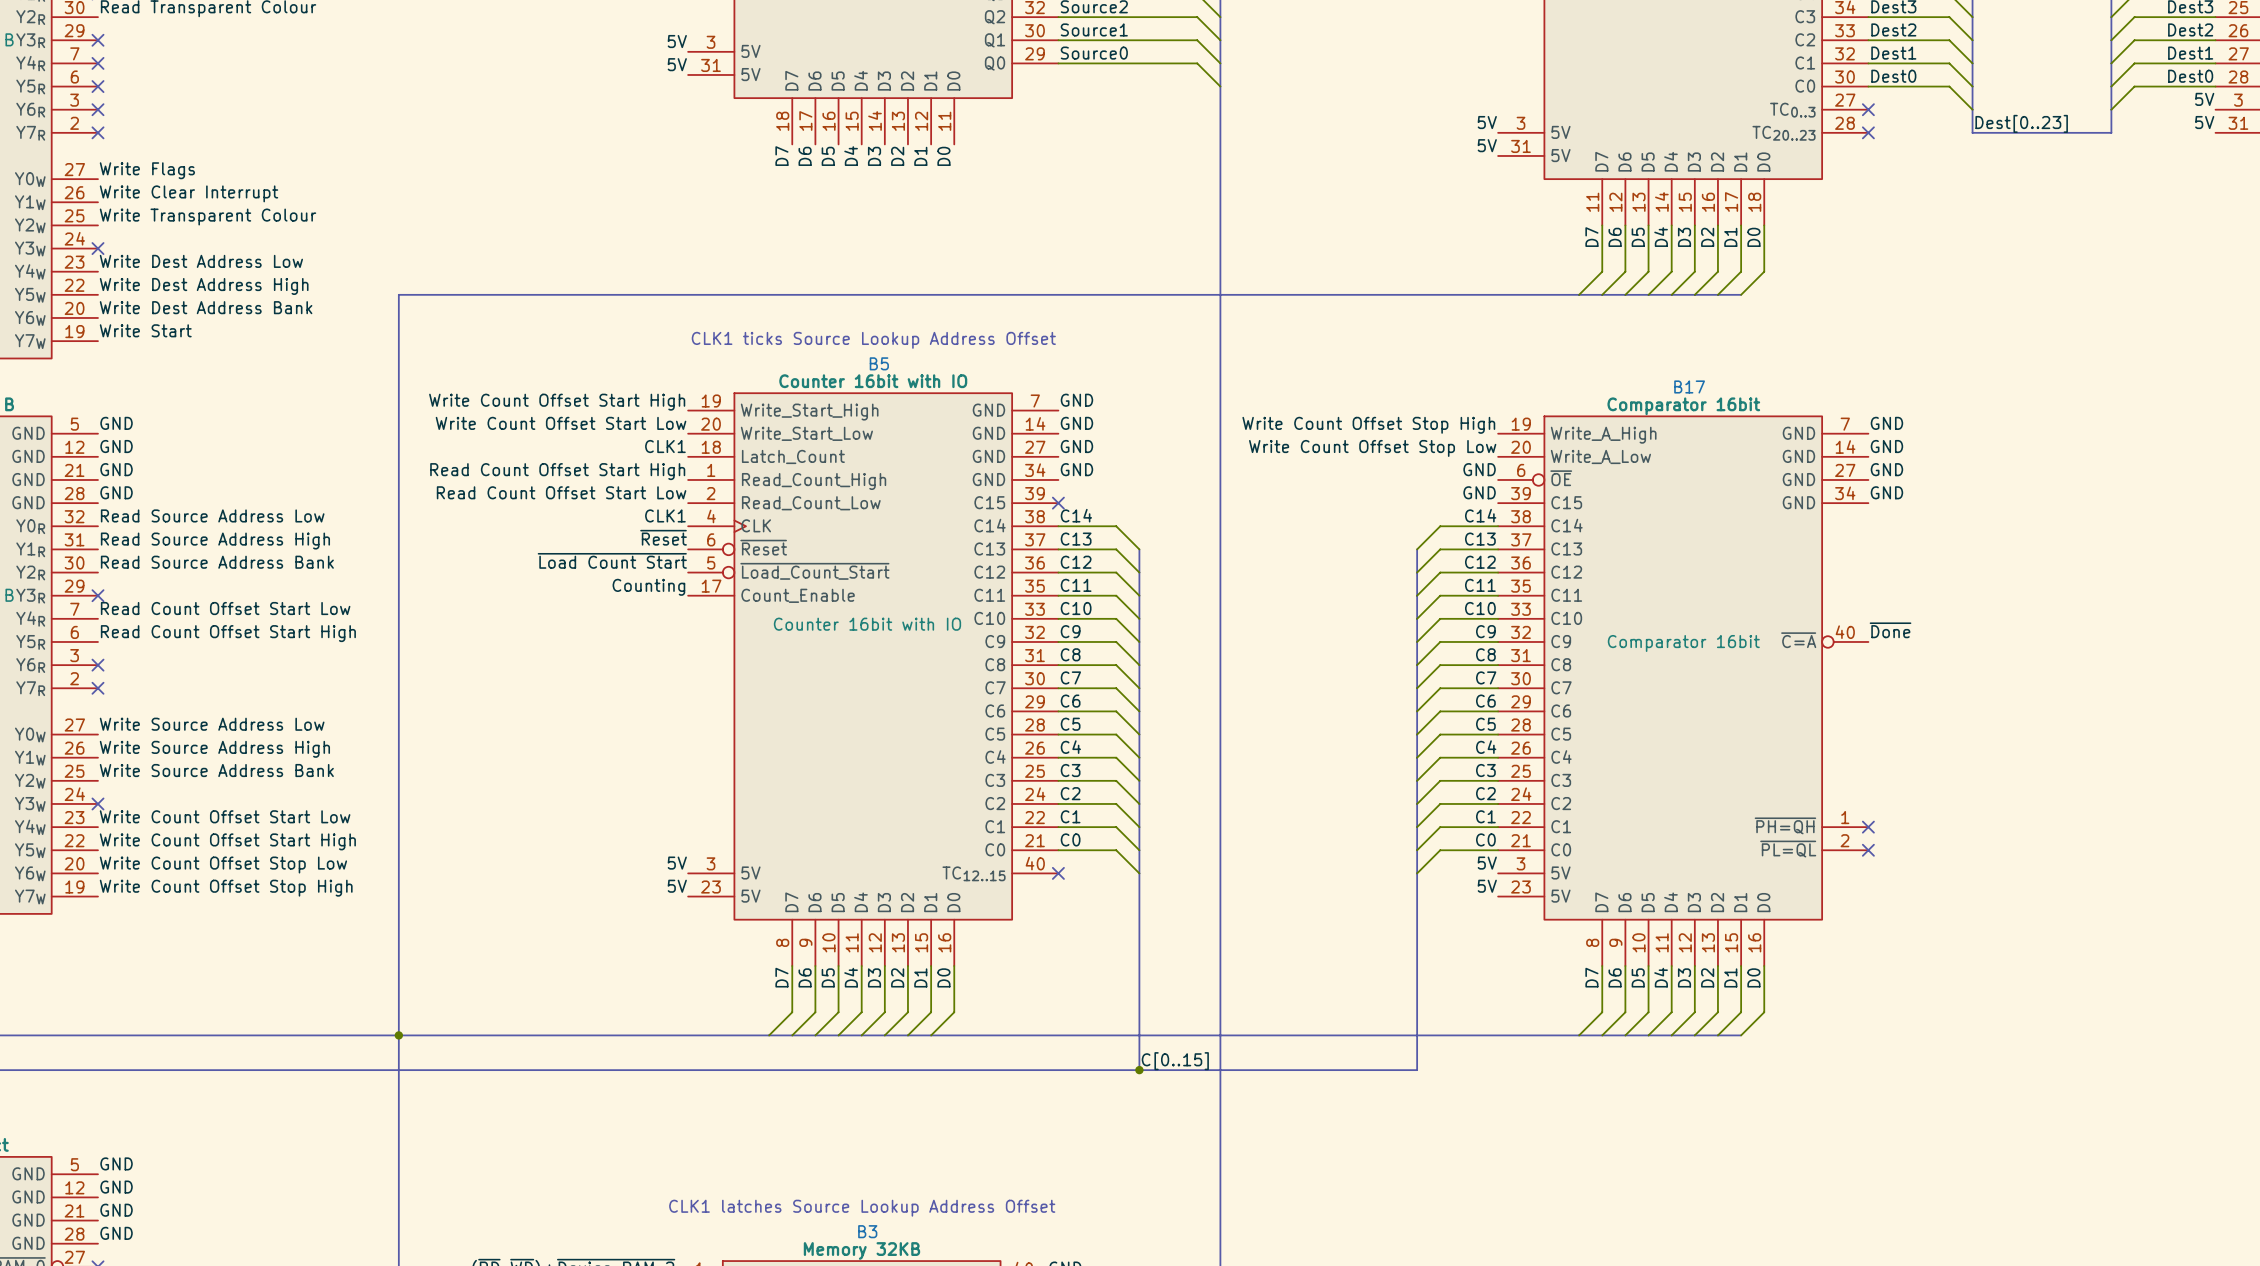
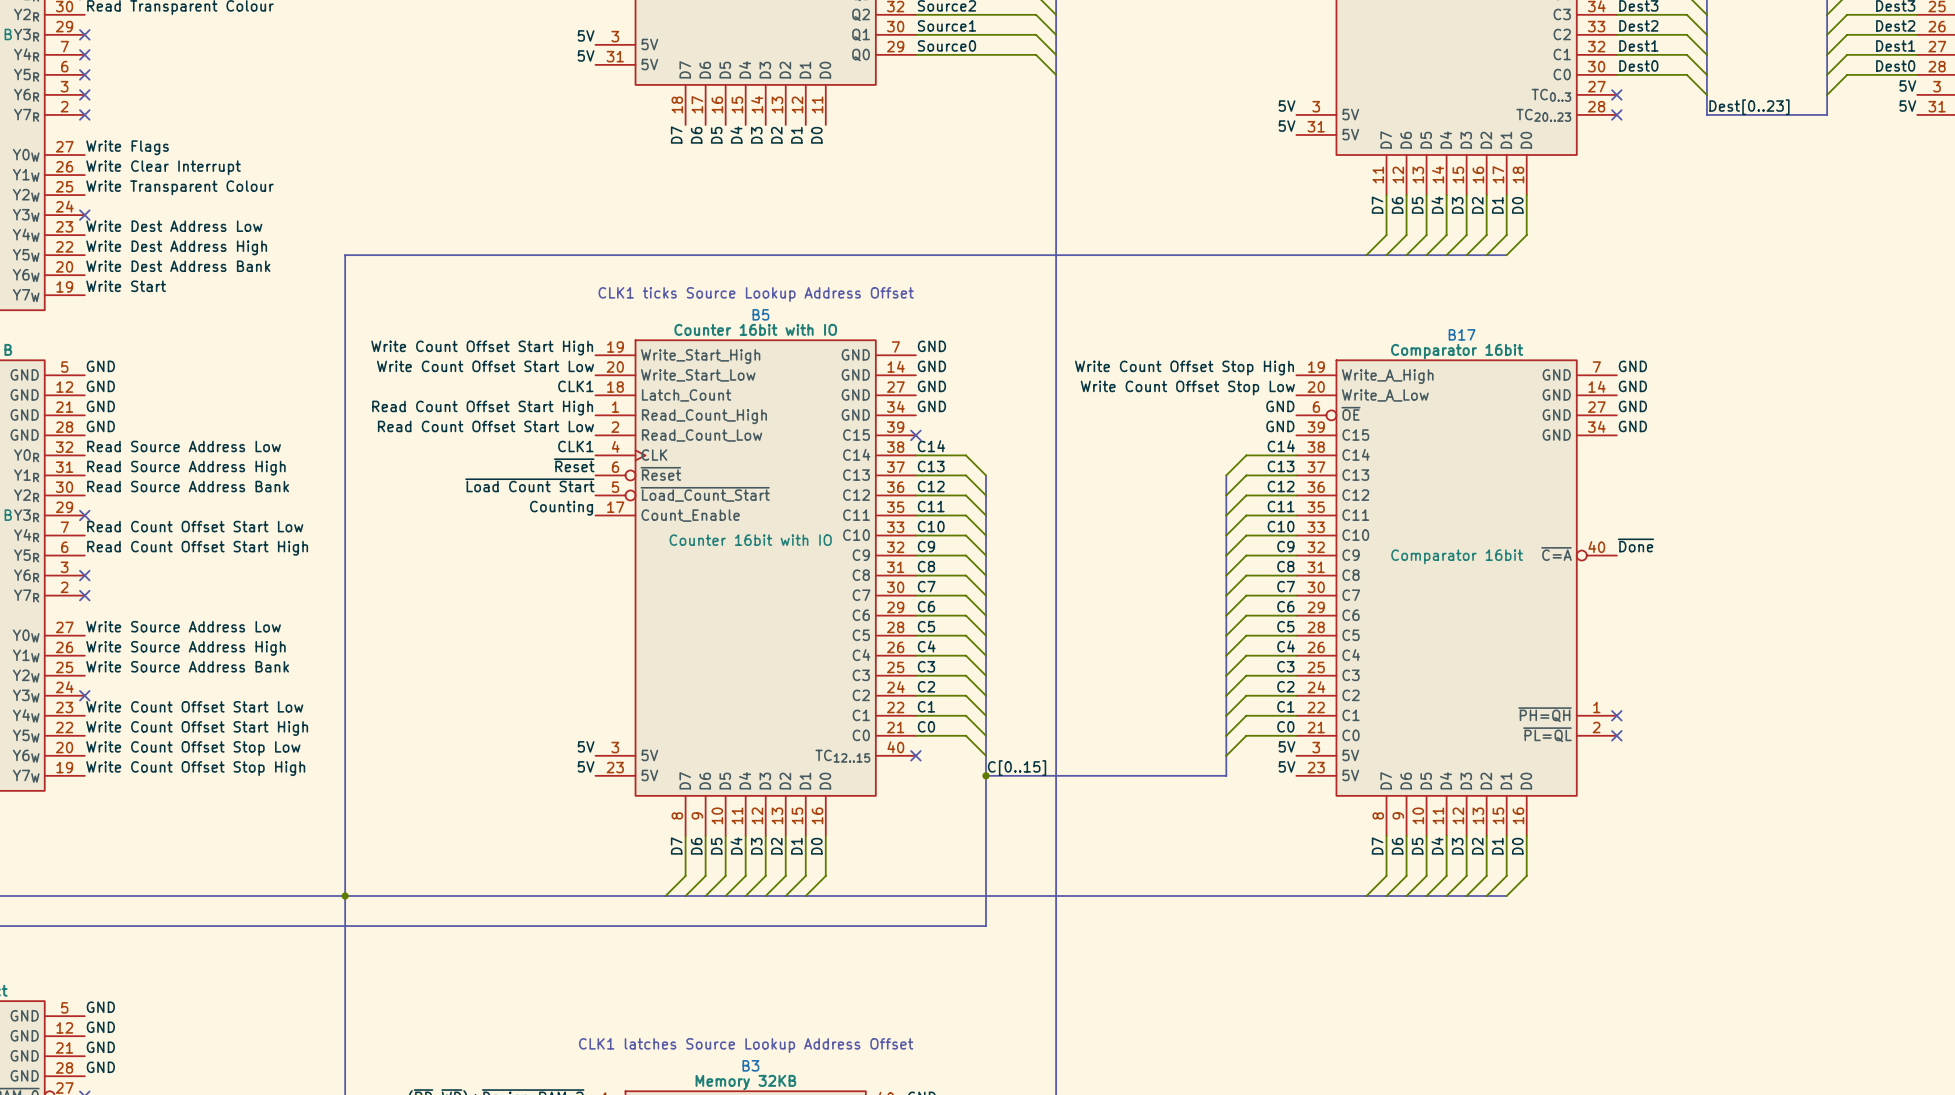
junction: none -> (985, 775)
bus: (1417, 896) (1417, 1070) (1139, 1070) -> (1226, 775) (985, 775)
label position: C[0..15] (1175, 1061) -> C[0..15] (1017, 768)
junction: (1139, 1070) -> none

